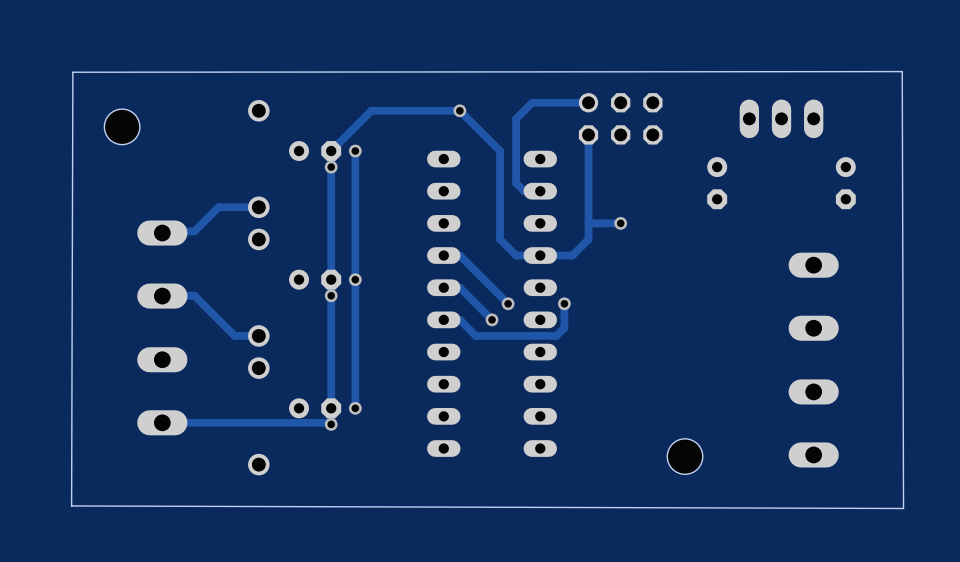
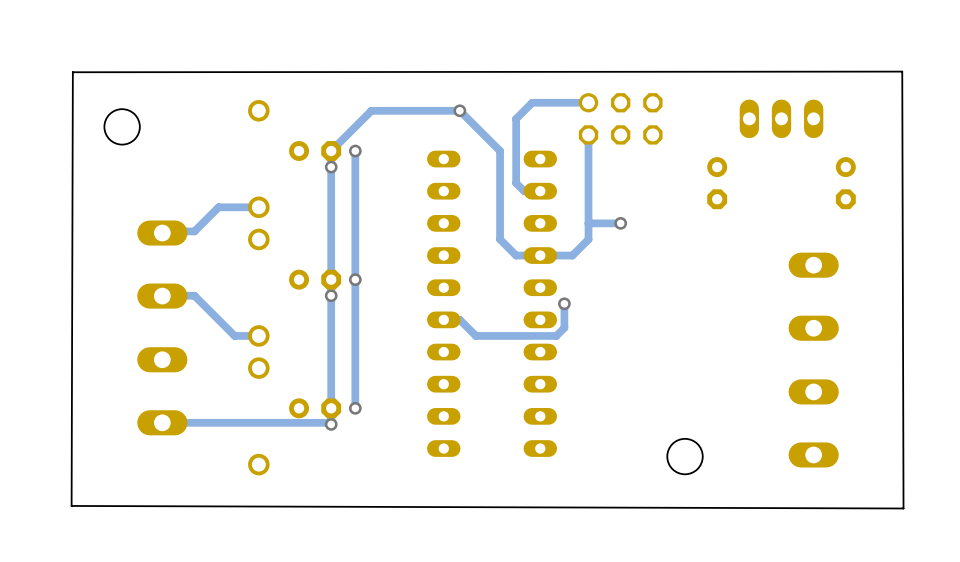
track: (443, 255) (459, 255) (508, 303) -> none
track: (443, 287) (459, 287) (492, 319) -> none
via: (508, 303) -> none
via: (492, 319) -> none

